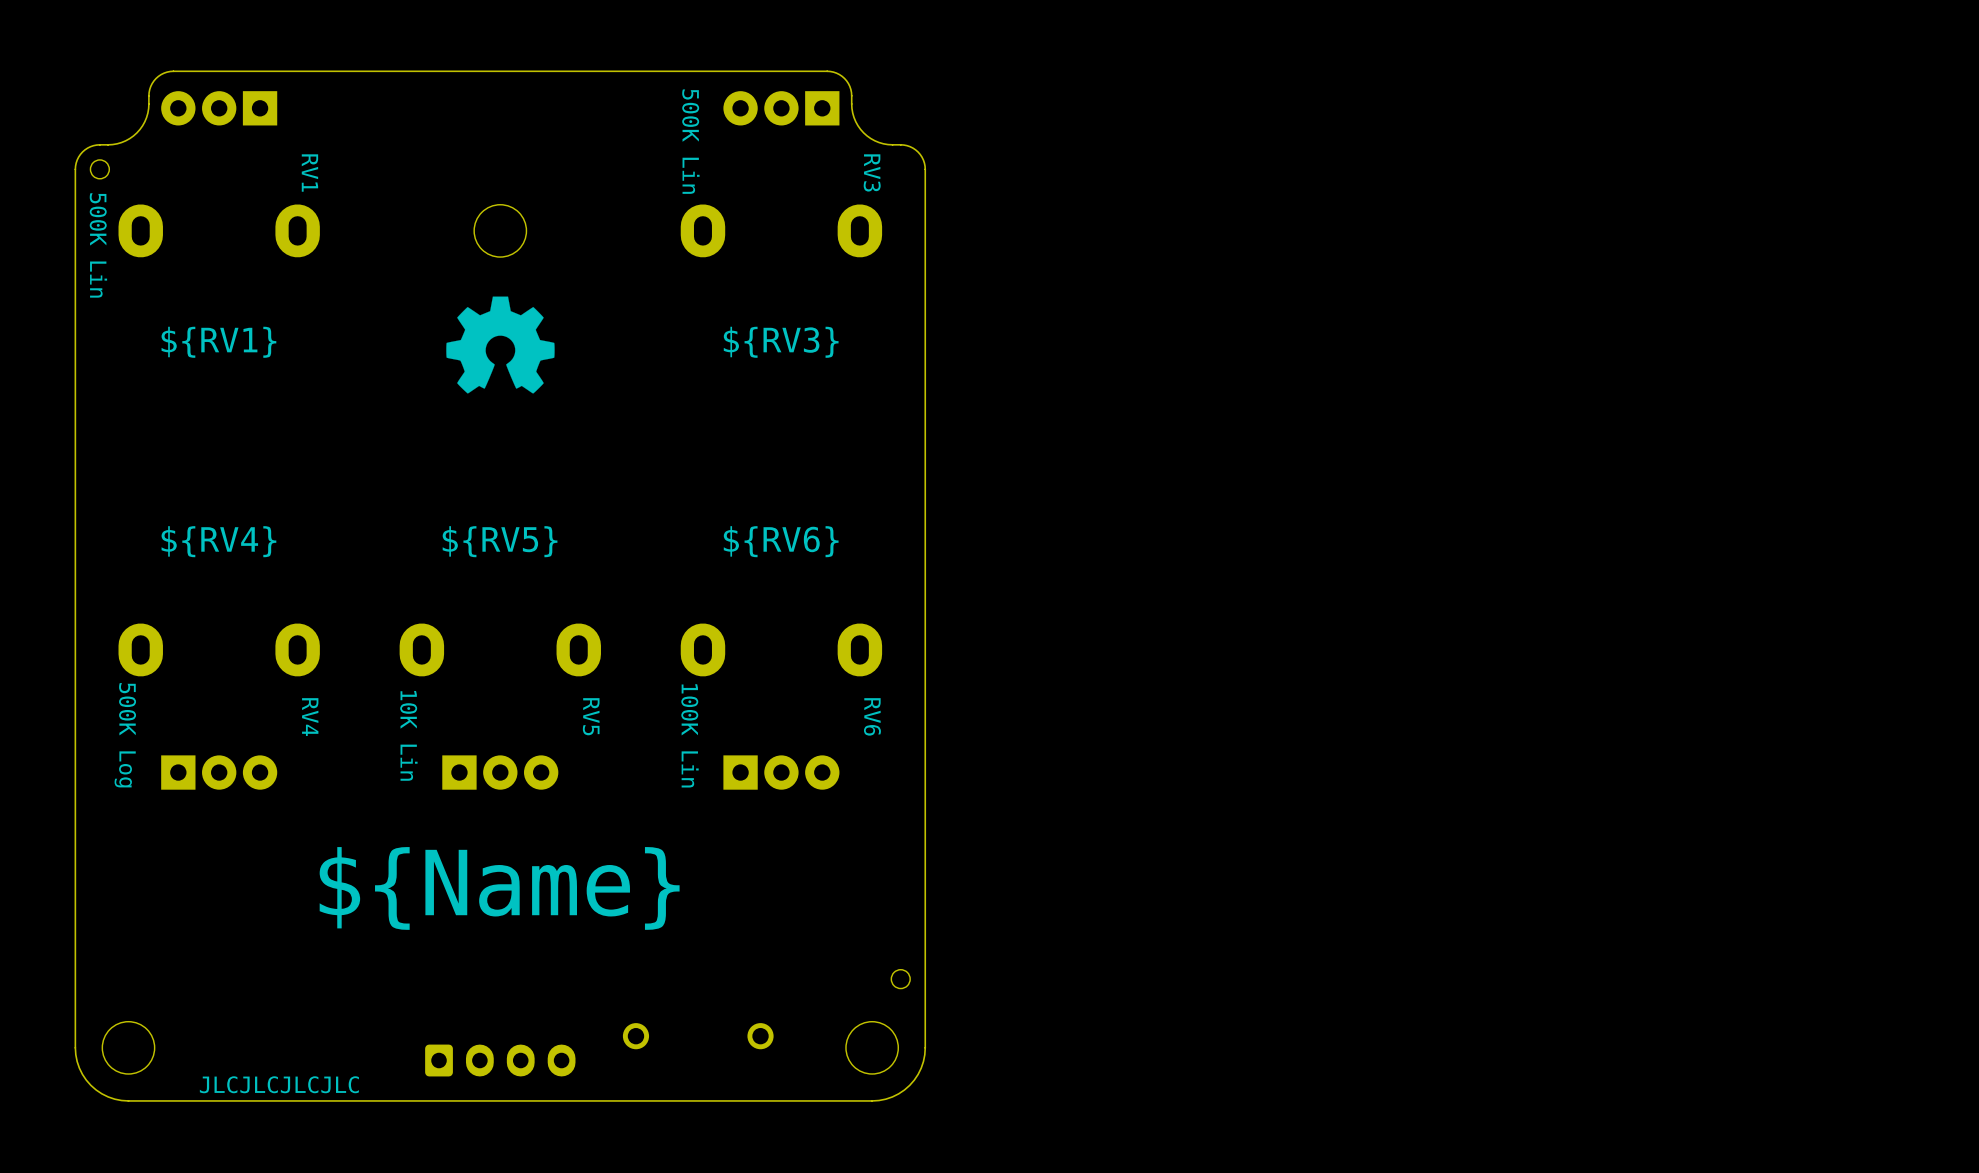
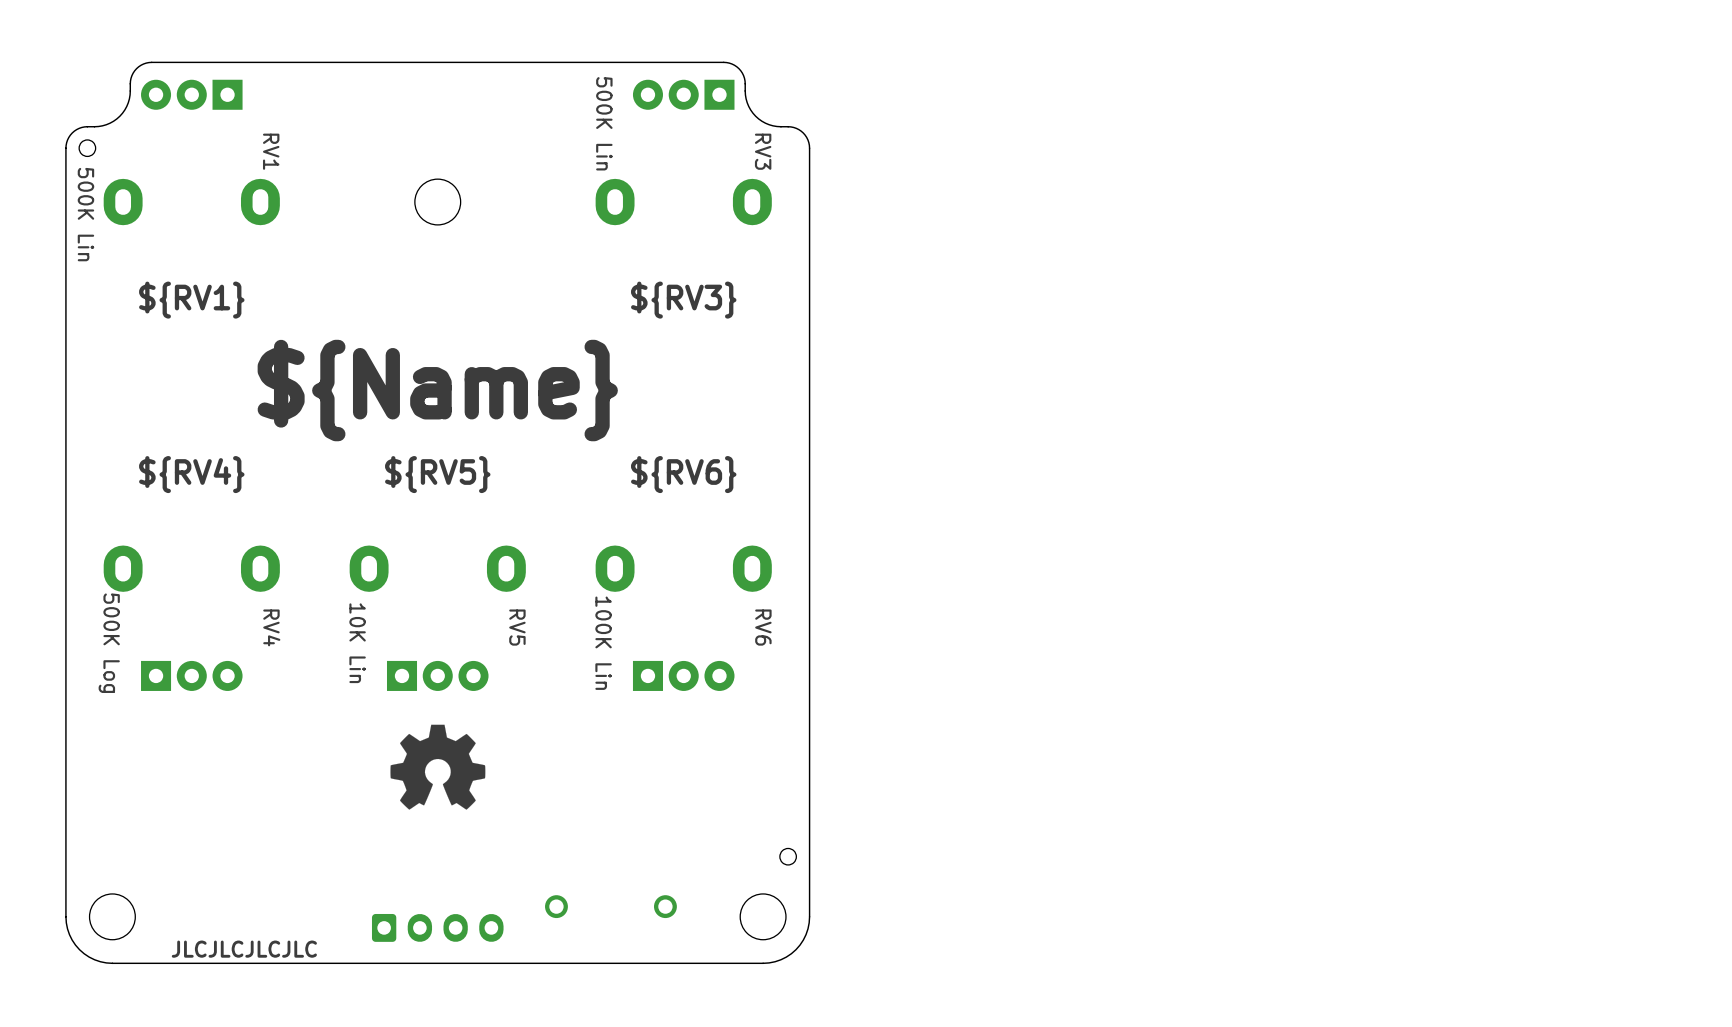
drawing: [446, 296, 555, 394] -> none
text: none -> ${Name} (437, 390)
drawing: none -> [390, 724, 486, 810]
text: ${Name} (499, 888) -> none

